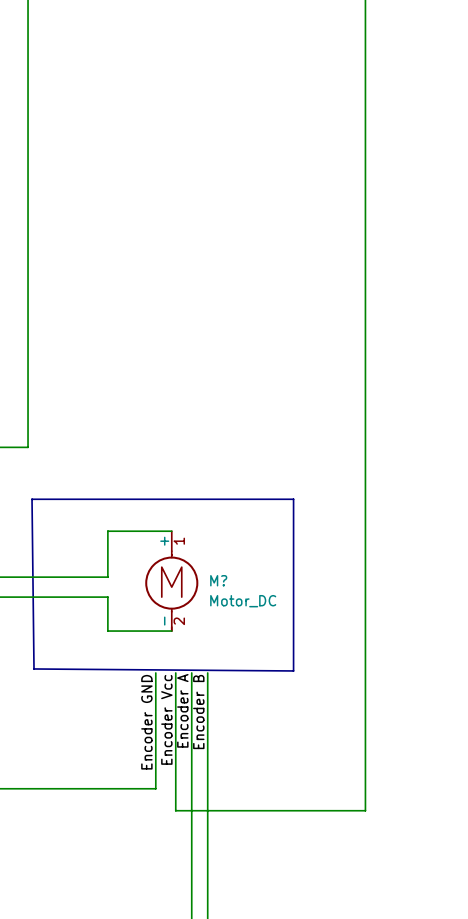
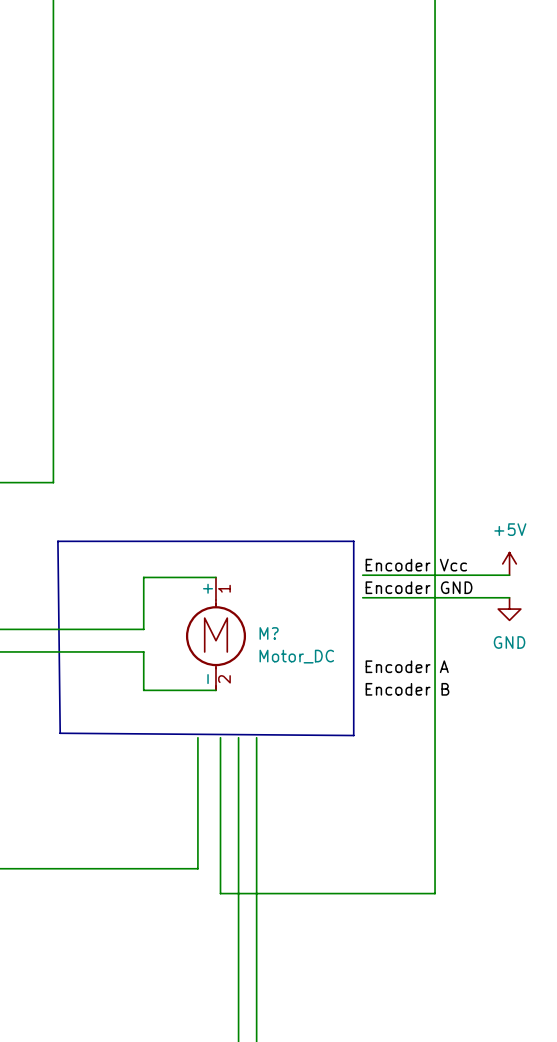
power symbol: none -> +5V (509, 563)
wire: none -> (362, 575) (509, 575)
wire: none -> (362, 597) (509, 597)
power symbol: none -> GND (509, 609)
label rotation: 0° (182, 710) -> 90° clockwise (407, 666)
label position: Encoder A (182, 710) -> Encoder A (407, 666)
label rotation: 0° (198, 712) -> 90° clockwise (407, 689)
label position: Encoder B (198, 712) -> Encoder B (407, 689)
label rotation: 0° (166, 719) -> 90° clockwise (416, 565)
label position: Encoder Vcc (166, 719) -> Encoder Vcc (416, 565)
label rotation: 0° (146, 722) -> 90° clockwise (419, 587)
label position: Encoder GND (146, 722) -> Encoder GND (419, 587)

